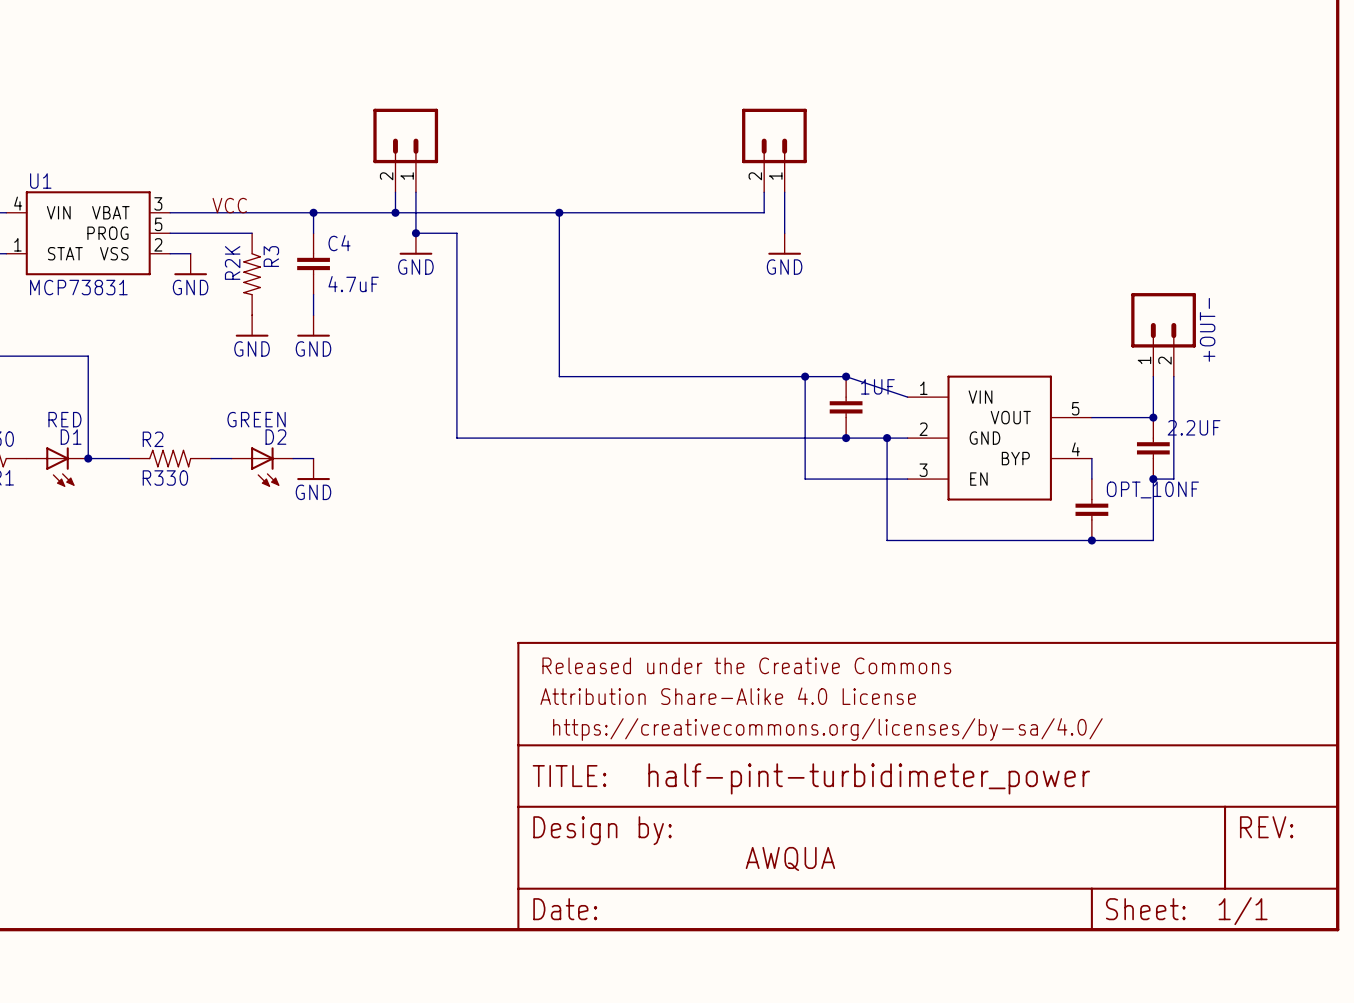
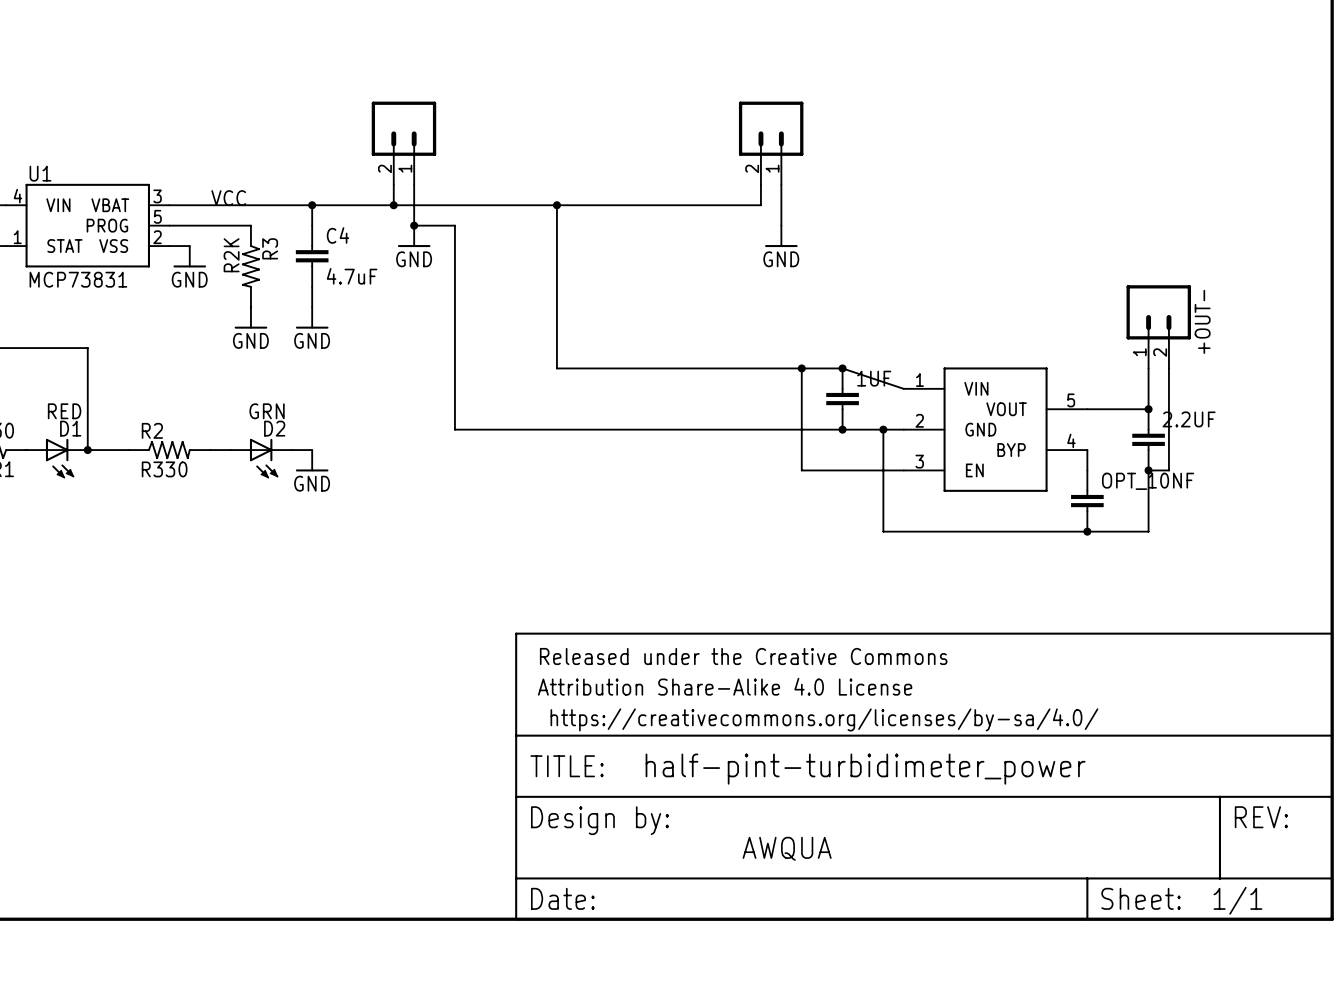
D2 value: GREEN (256, 419) -> GRN (267, 411)

